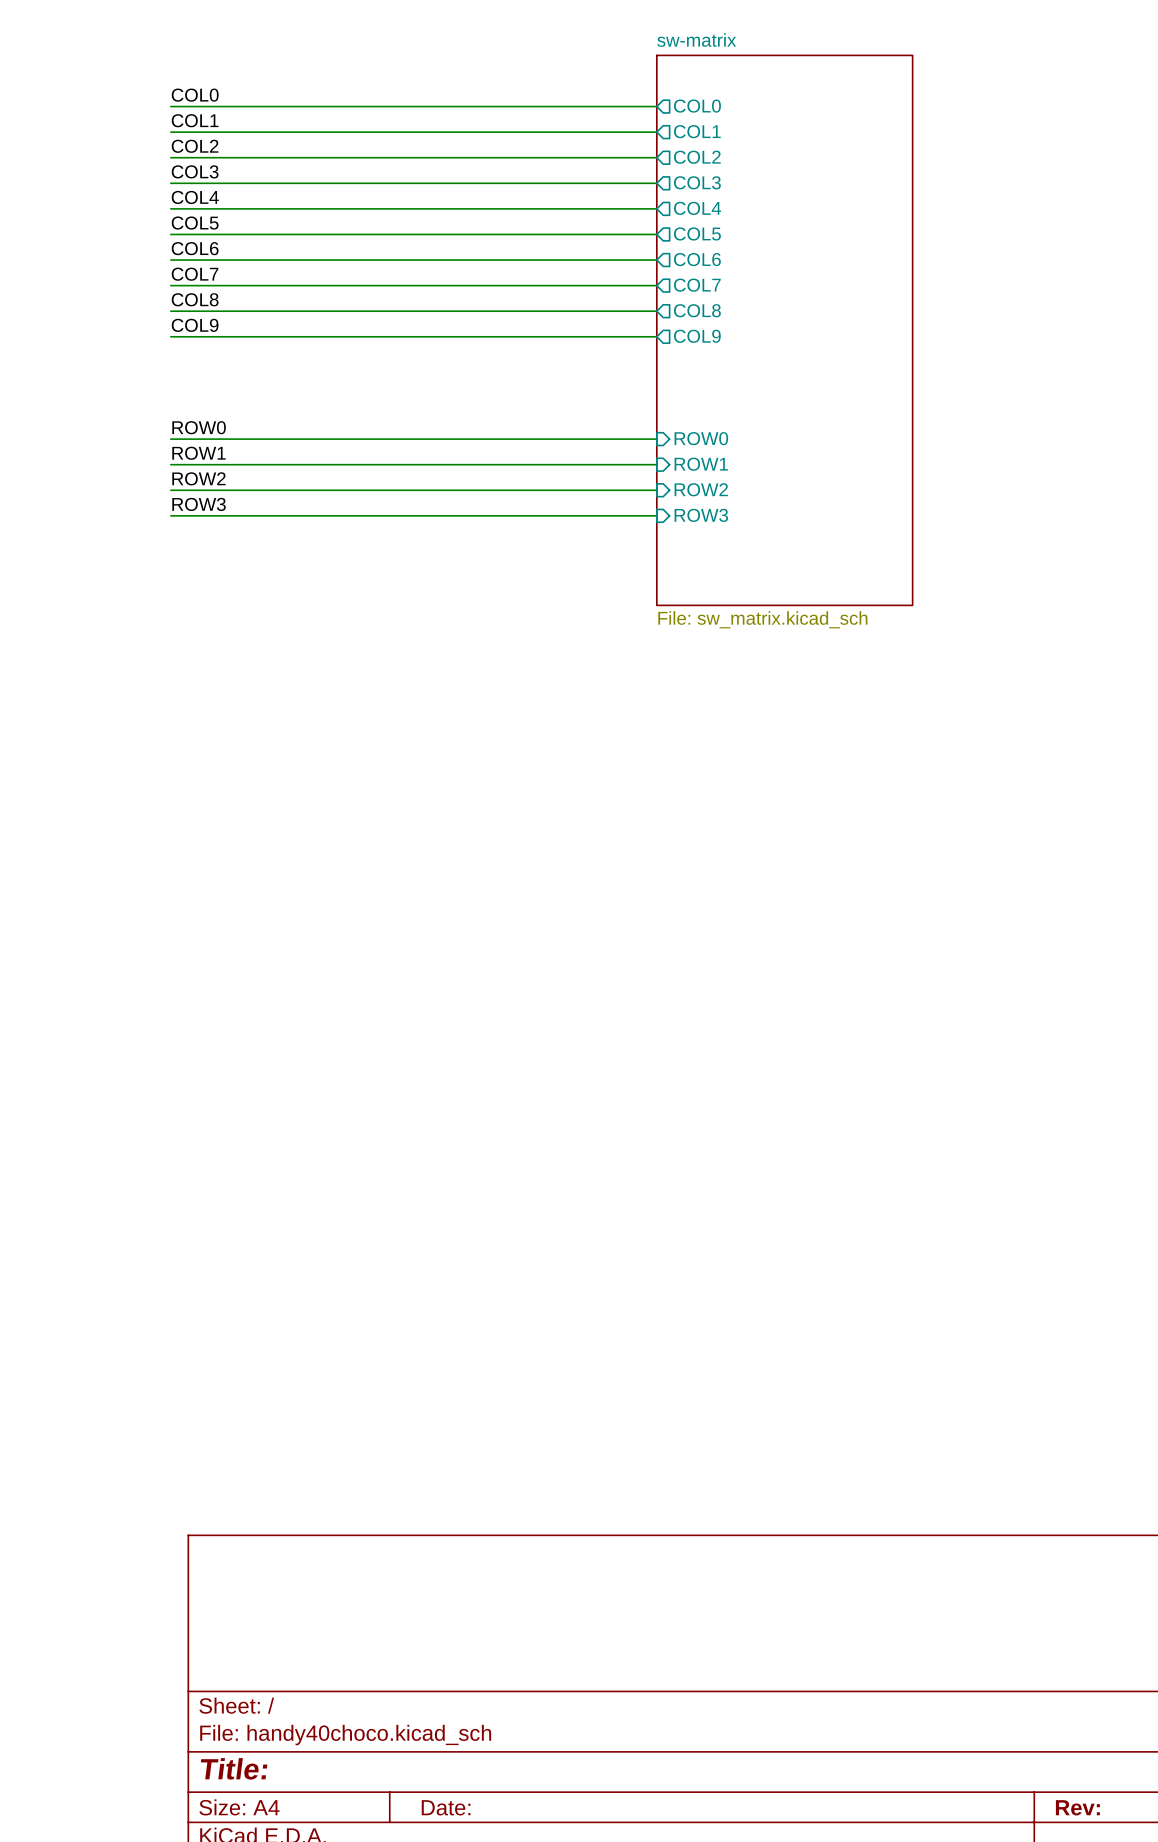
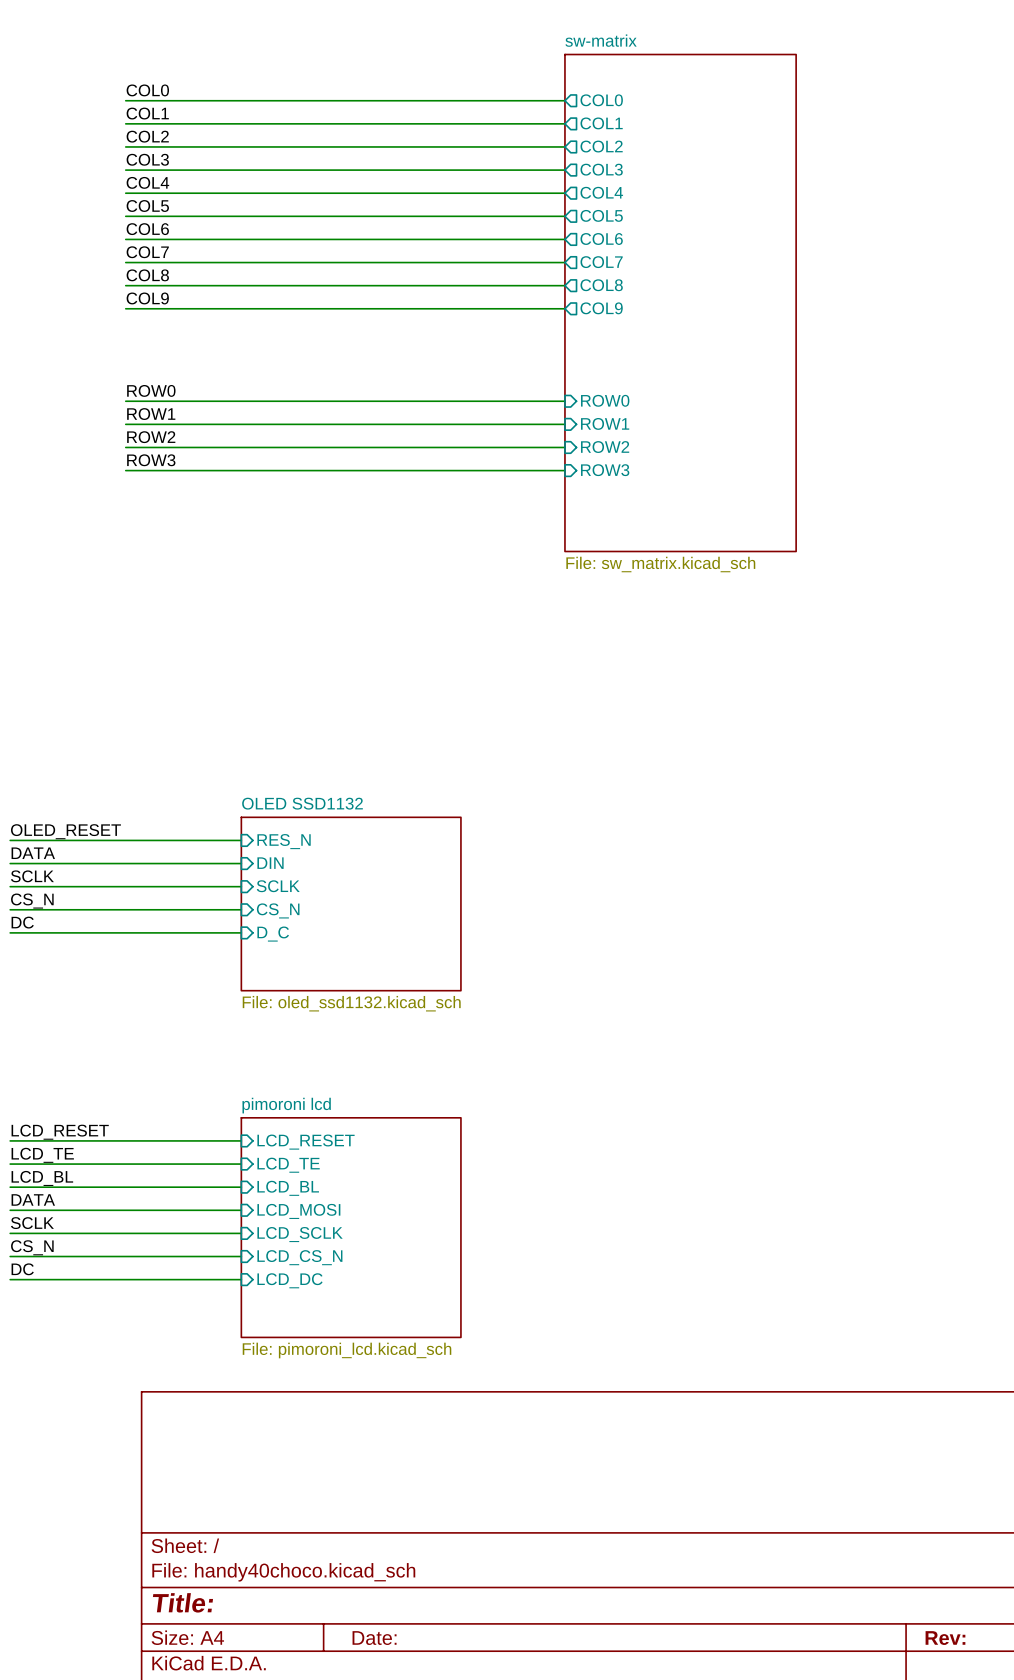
label: none -> OLED_RESET (65, 831)
wire: none -> (10, 840) (241, 840)
sheet pin: none -> RES_N (284, 841)
label: none -> DATA (33, 853)
wire: none -> (10, 863) (241, 863)
sheet pin: none -> DIN (270, 863)
label: none -> SCLK (32, 876)
sheet pin: none -> SCLK (278, 886)
wire: none -> (10, 886) (241, 886)
label: none -> CS_N (32, 901)
sheet OLED SSD1132: none -> File: oled_ssd1132.kicad_sch (351, 904)
wire: none -> (10, 909) (241, 909)
sheet pin: none -> CS_N (278, 910)
label: none -> DC (22, 922)
wire: none -> (10, 932) (241, 932)
sheet pin: none -> D_C (273, 934)
label: none -> LCD_RESET (60, 1132)
wire: none -> (10, 1140) (241, 1140)
sheet pin: none -> LCD_RESET (306, 1142)
label: none -> LCD_TE (42, 1155)
wire: none -> (10, 1164) (241, 1164)
sheet pin: none -> LCD_TE (288, 1165)
label: none -> LCD_BL (42, 1178)
wire: none -> (10, 1187) (241, 1187)
sheet pin: none -> LCD_BL (288, 1188)
label: none -> DATA (33, 1199)
wire: none -> (10, 1210) (241, 1210)
sheet pin: none -> LCD_MOSI (298, 1211)
label: none -> SCLK (32, 1223)
sheet pimoroni lcd: none -> File: pimoroni_lcd.kicad_sch (351, 1227)
wire: none -> (10, 1233) (241, 1233)
sheet pin: none -> LCD_SCLK (300, 1234)
label: none -> CS_N (32, 1247)
wire: none -> (10, 1256) (241, 1256)
sheet pin: none -> LCD_CS_N (299, 1257)
label: none -> DC (22, 1269)
wire: none -> (10, 1279) (241, 1279)
sheet pin: none -> LCD_DC (290, 1280)

